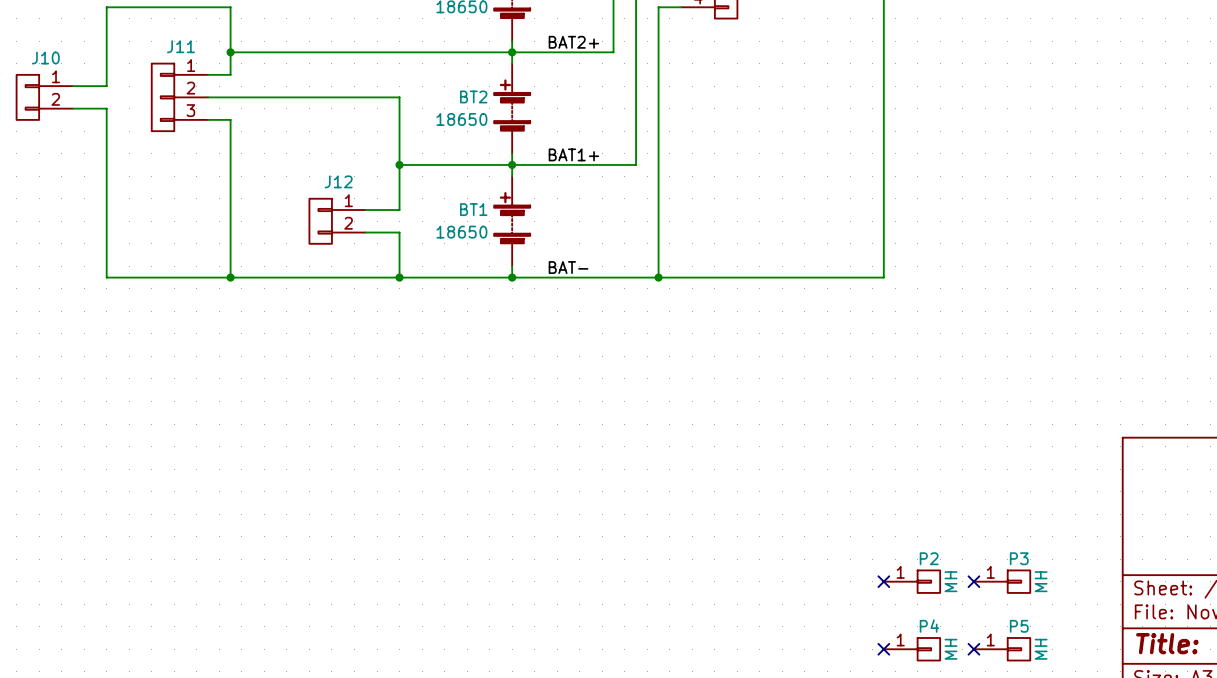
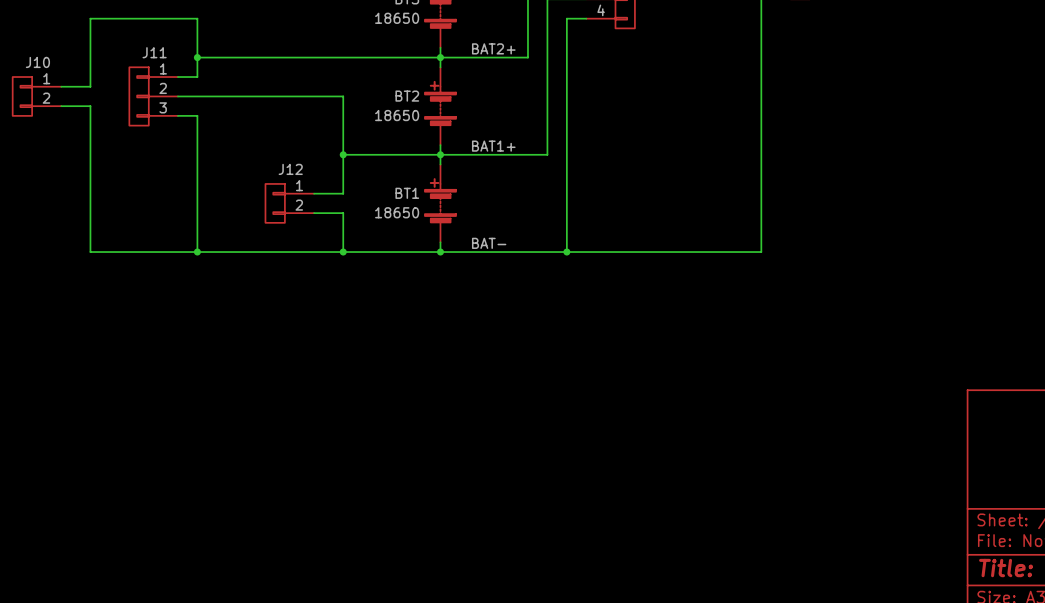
no-connect mark: (883, 581) -> none
P2: MH (911, 581) -> none
no-connect mark: (973, 581) -> none
P3: MH (1002, 581) -> none
no-connect mark: (883, 649) -> none
P4: MH (911, 649) -> none
no-connect mark: (973, 649) -> none
P5: MH (1002, 649) -> none

